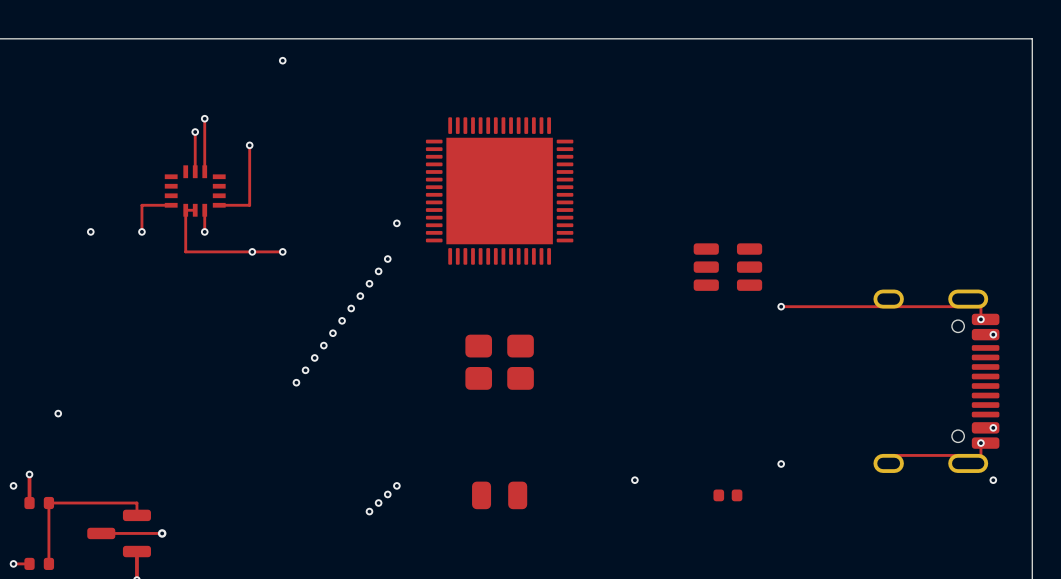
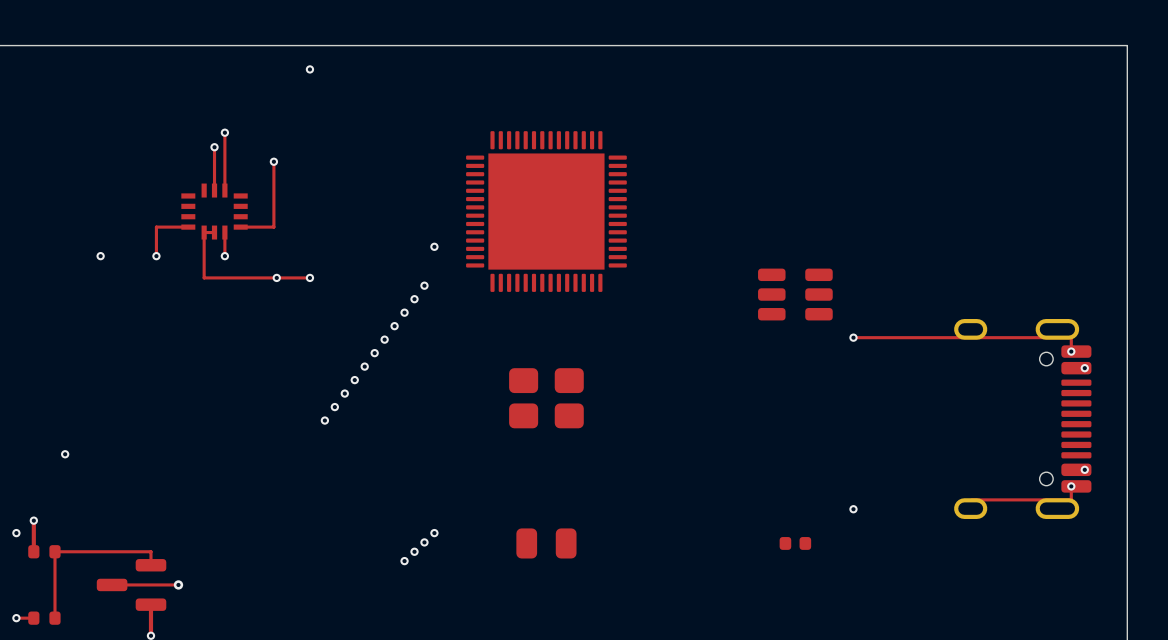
via: (634, 480) -> none
via: (993, 480) -> none

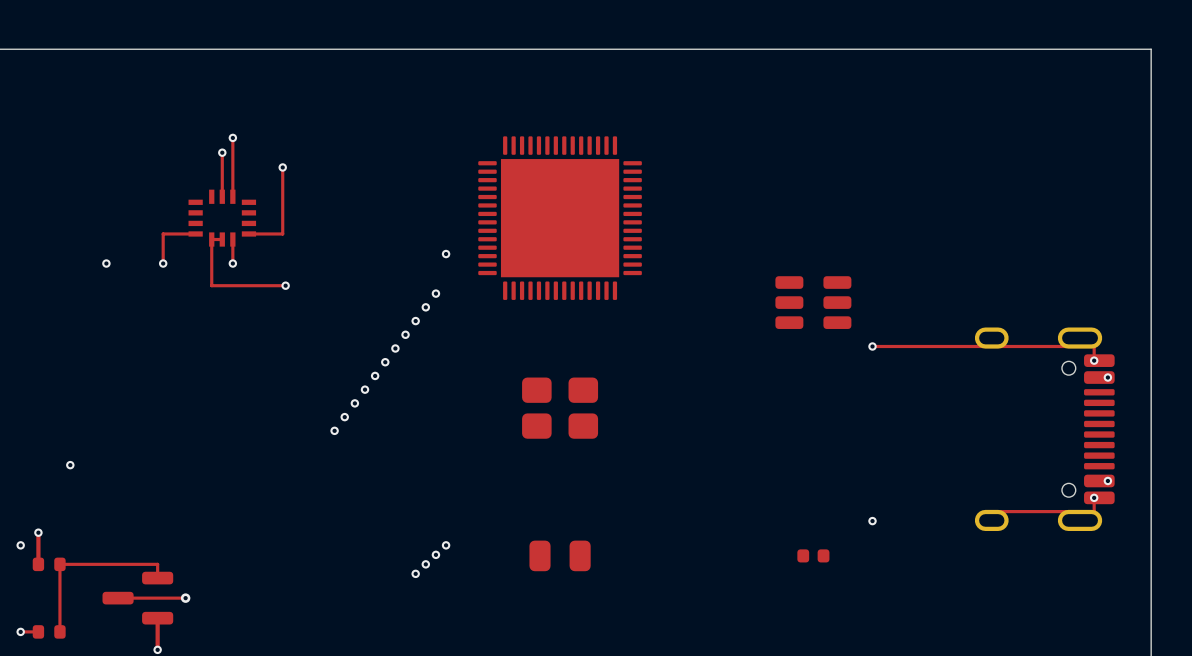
via: (309, 69) -> none
top track: (309, 277) (276, 277) -> none
via: (309, 277) -> none

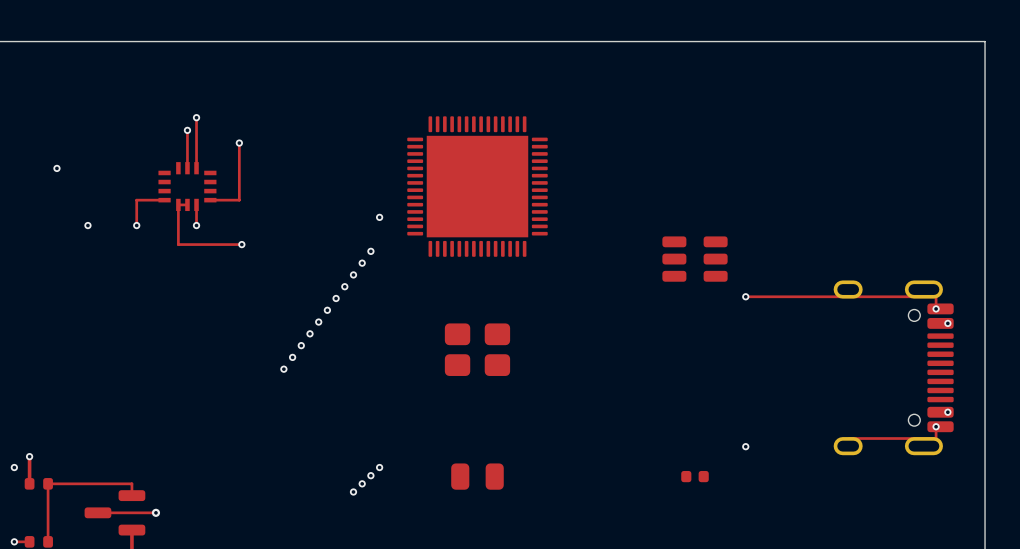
via: none -> (56, 168)
via: (70, 465) -> none

